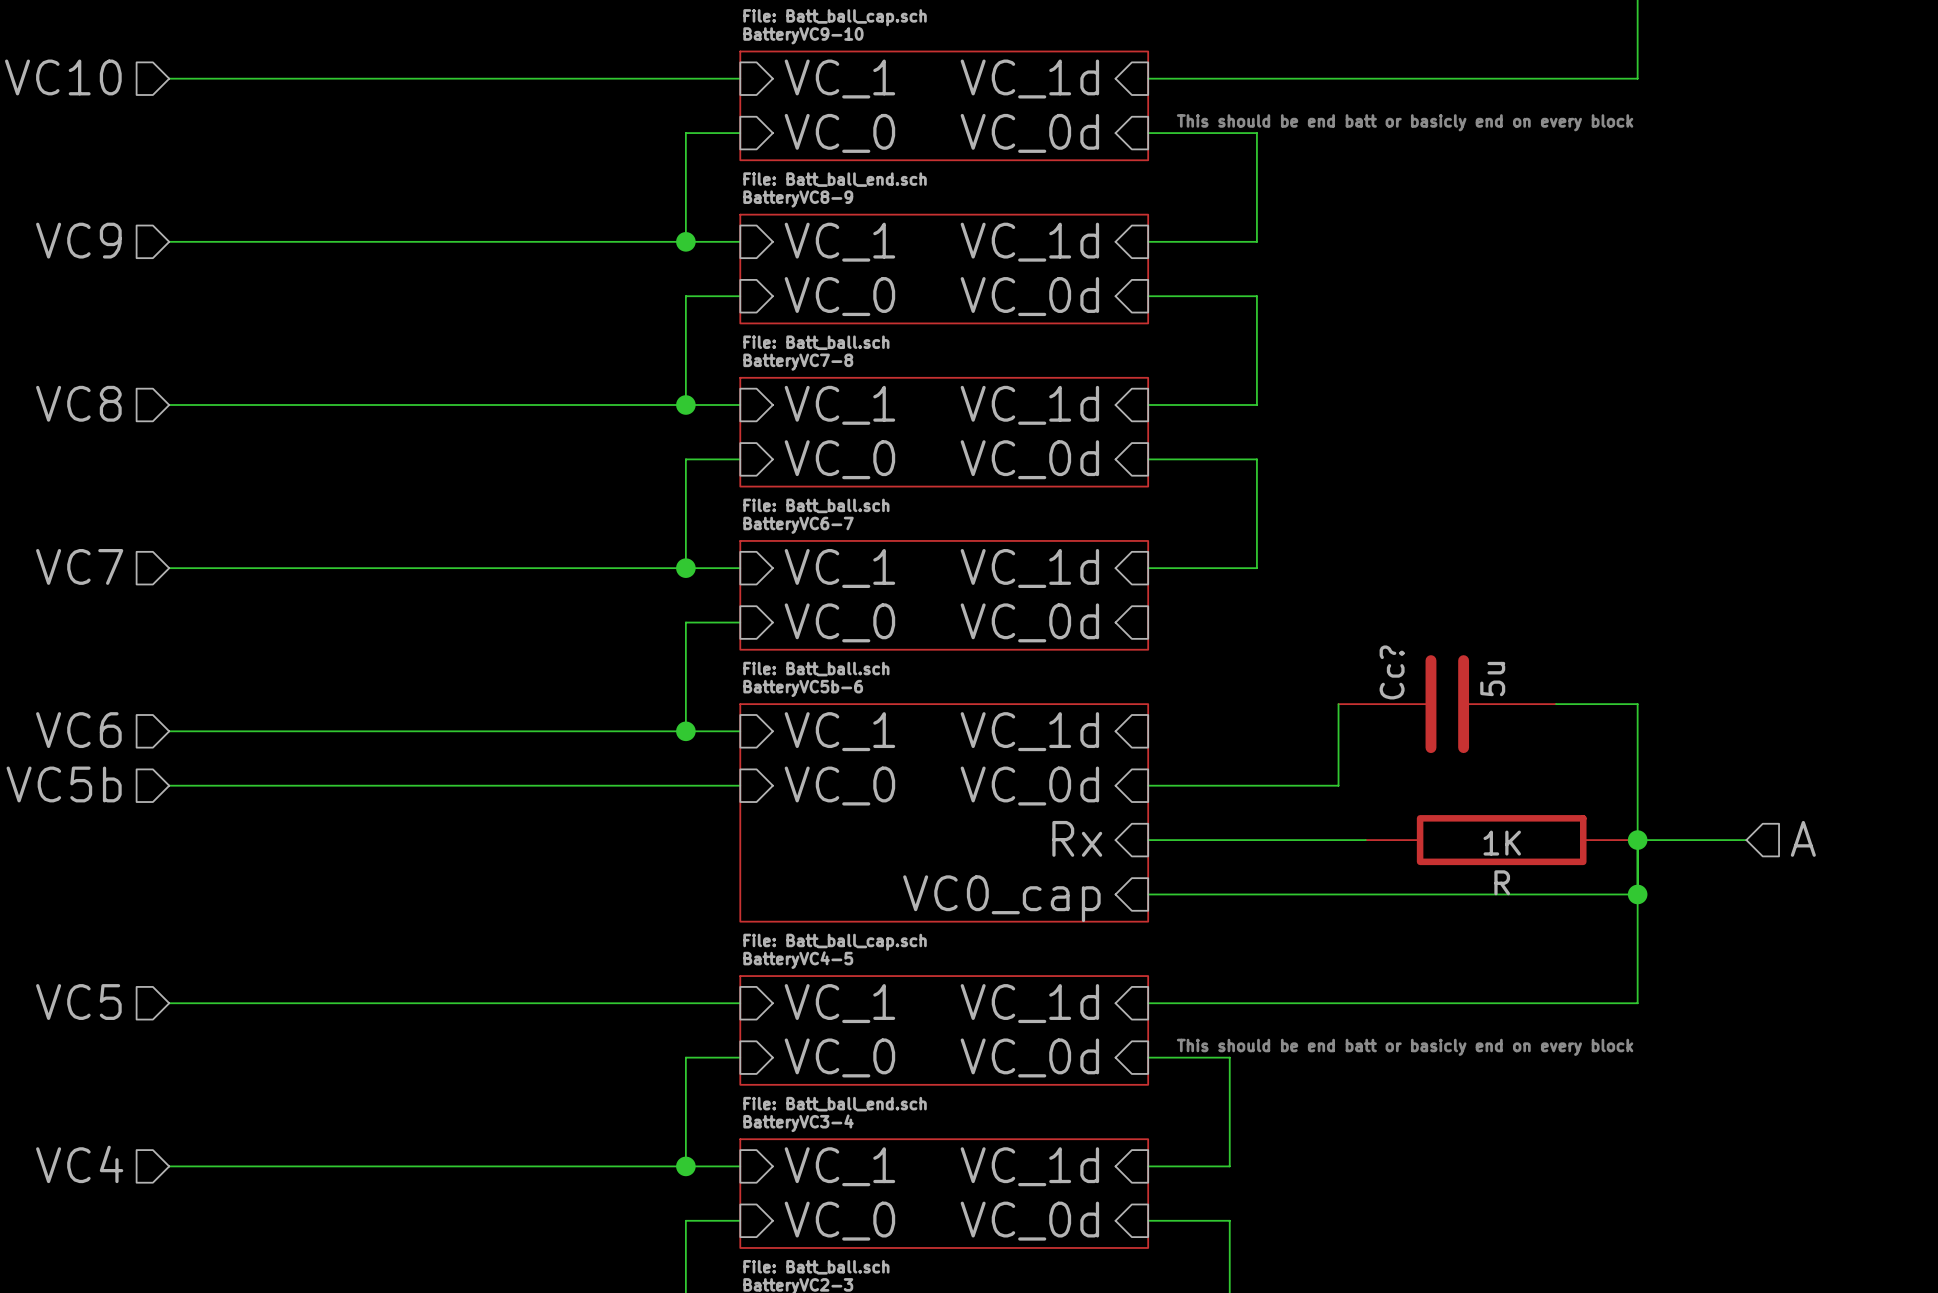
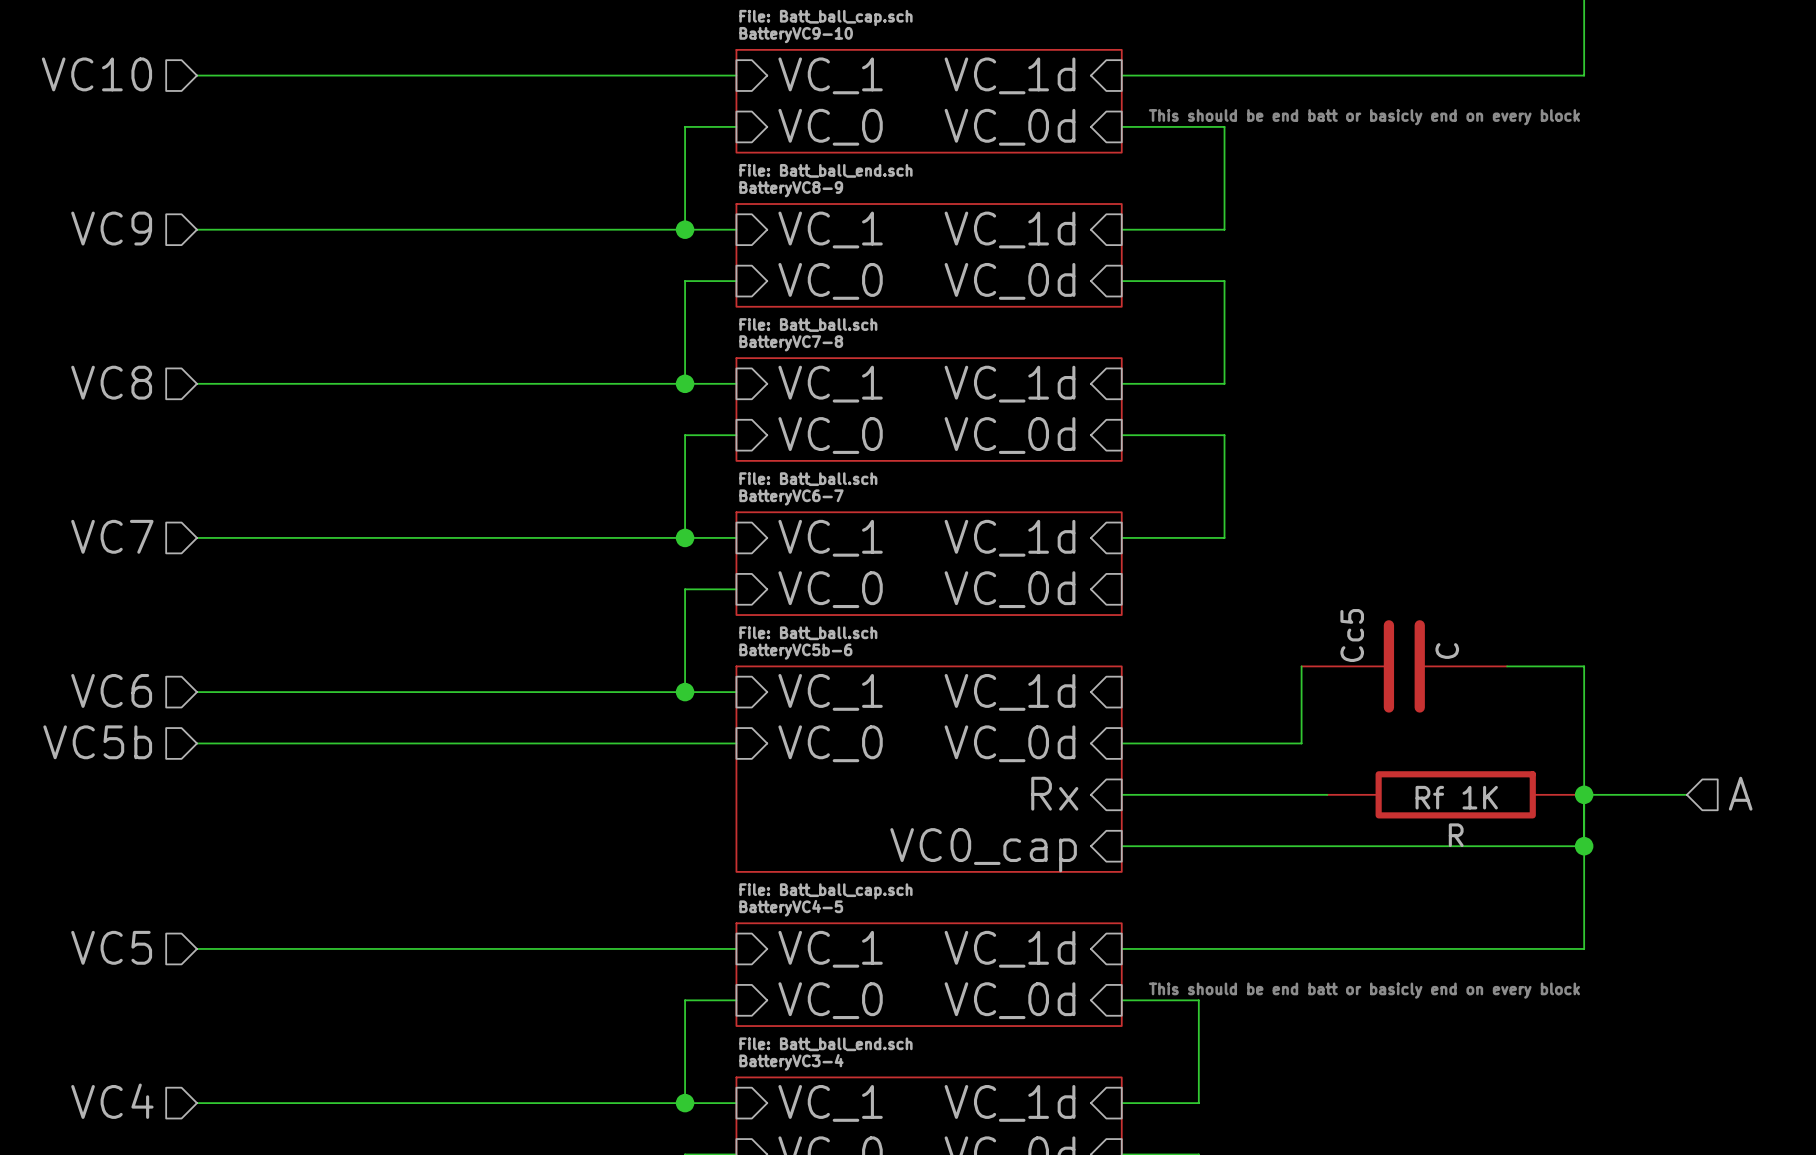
Cc? name: Cc? (1392, 672) -> Cc5 (1352, 635)
Cc? value: 5u (1492, 679) -> C (1447, 651)
R value: 1K (1502, 843) -> Rf 1K (1456, 797)

